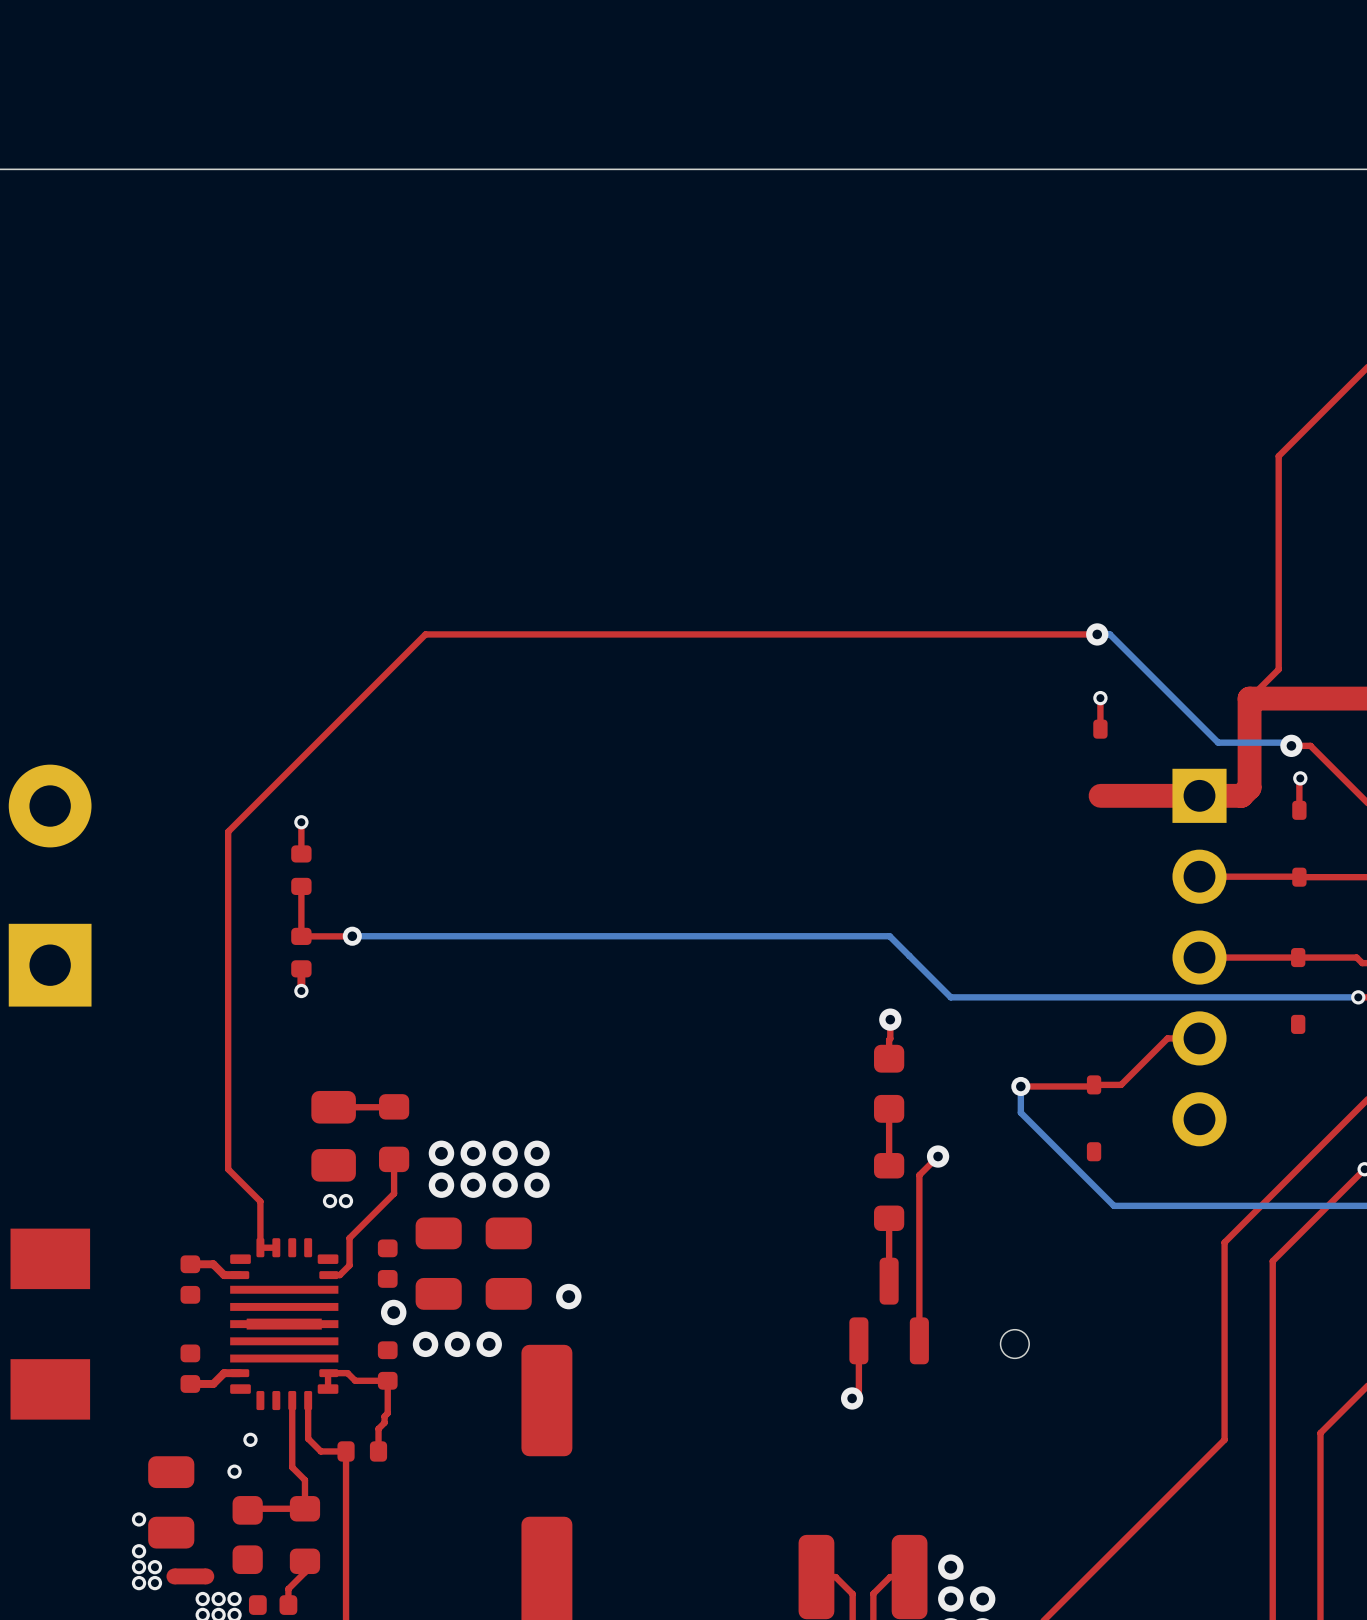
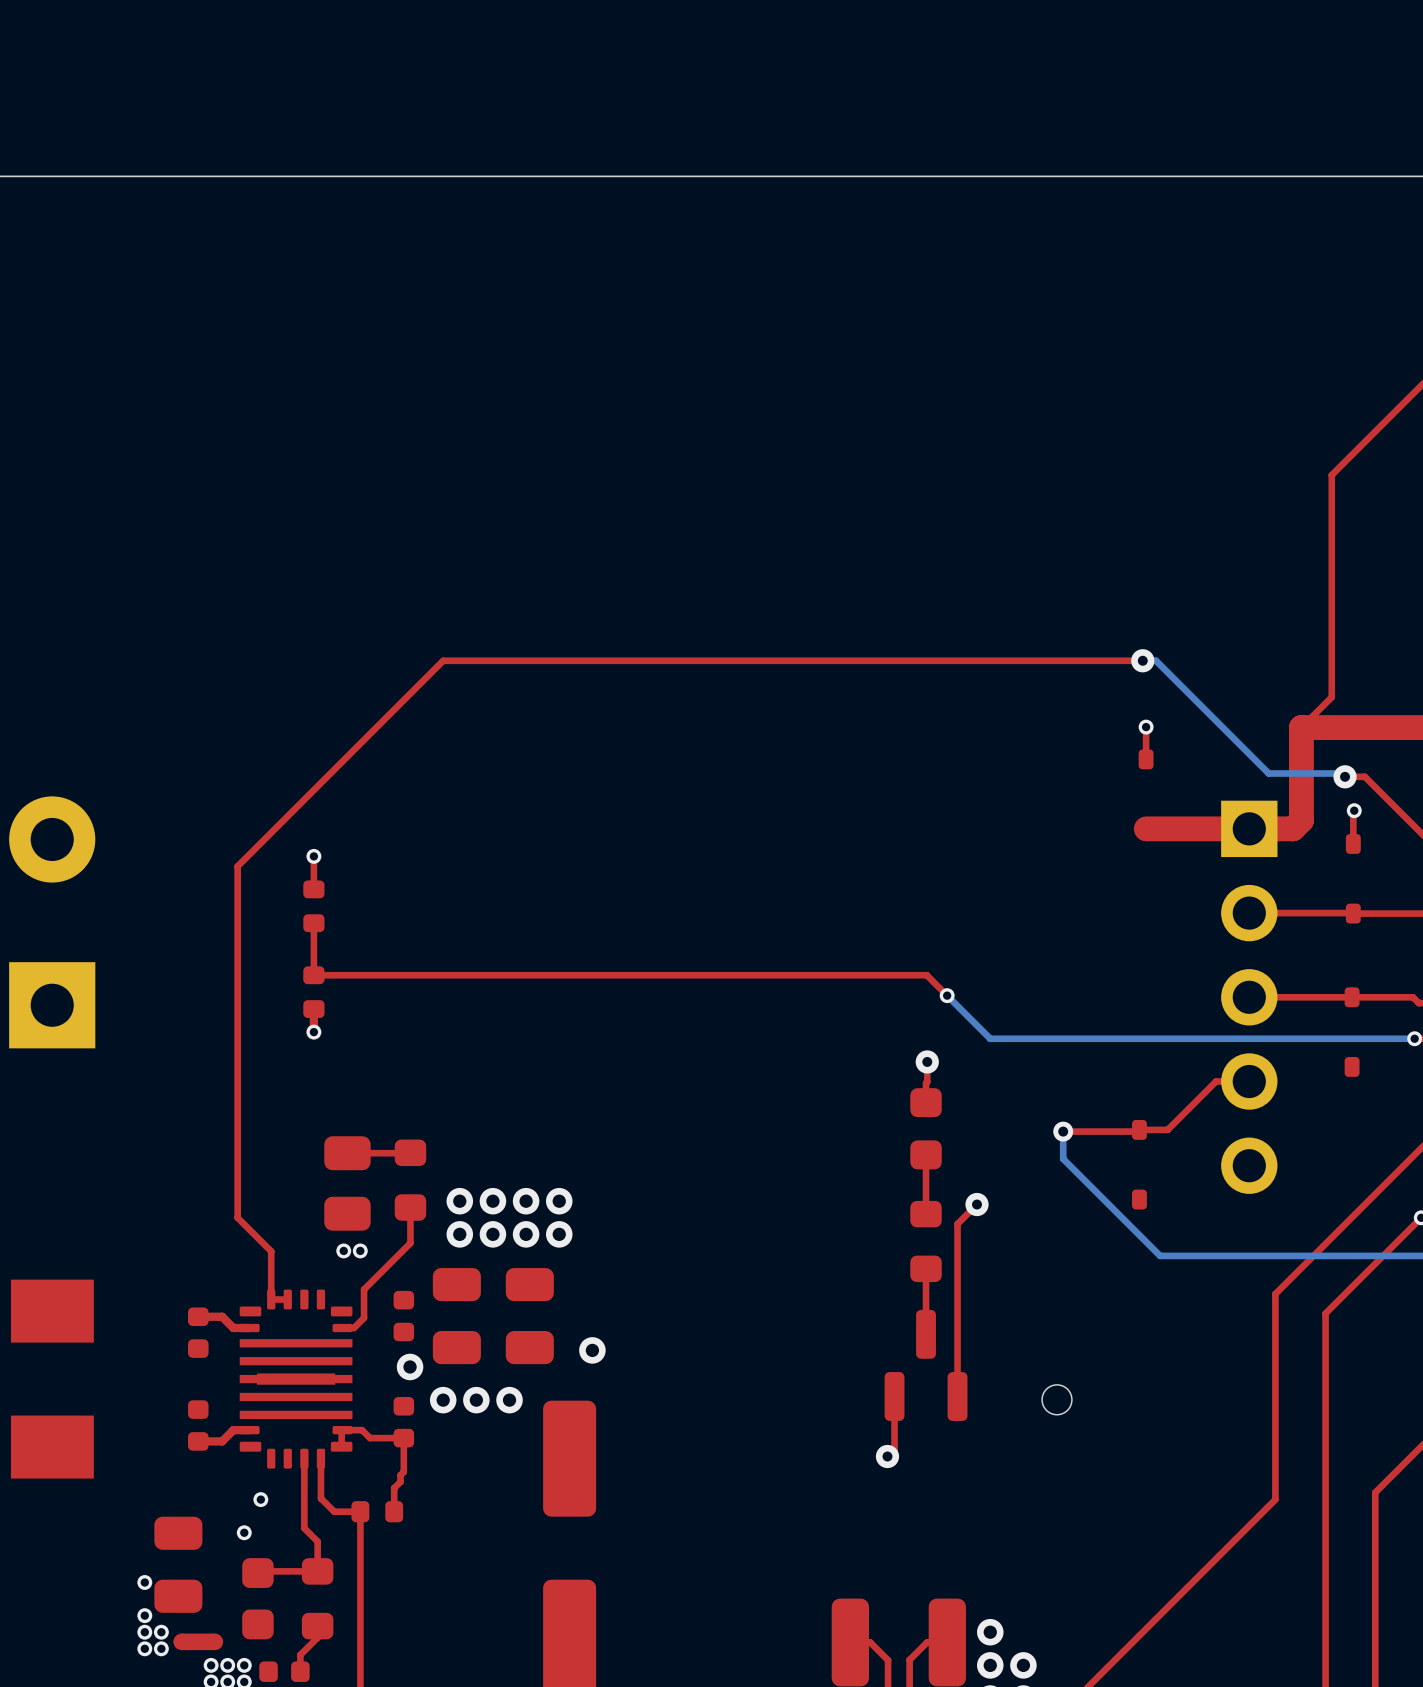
top track: none -> (366, 975) (926, 975) (947, 995)
bottom track: (352, 936) (889, 936) (909, 955) -> none
via: (352, 936) -> none
via: none -> (947, 995)

